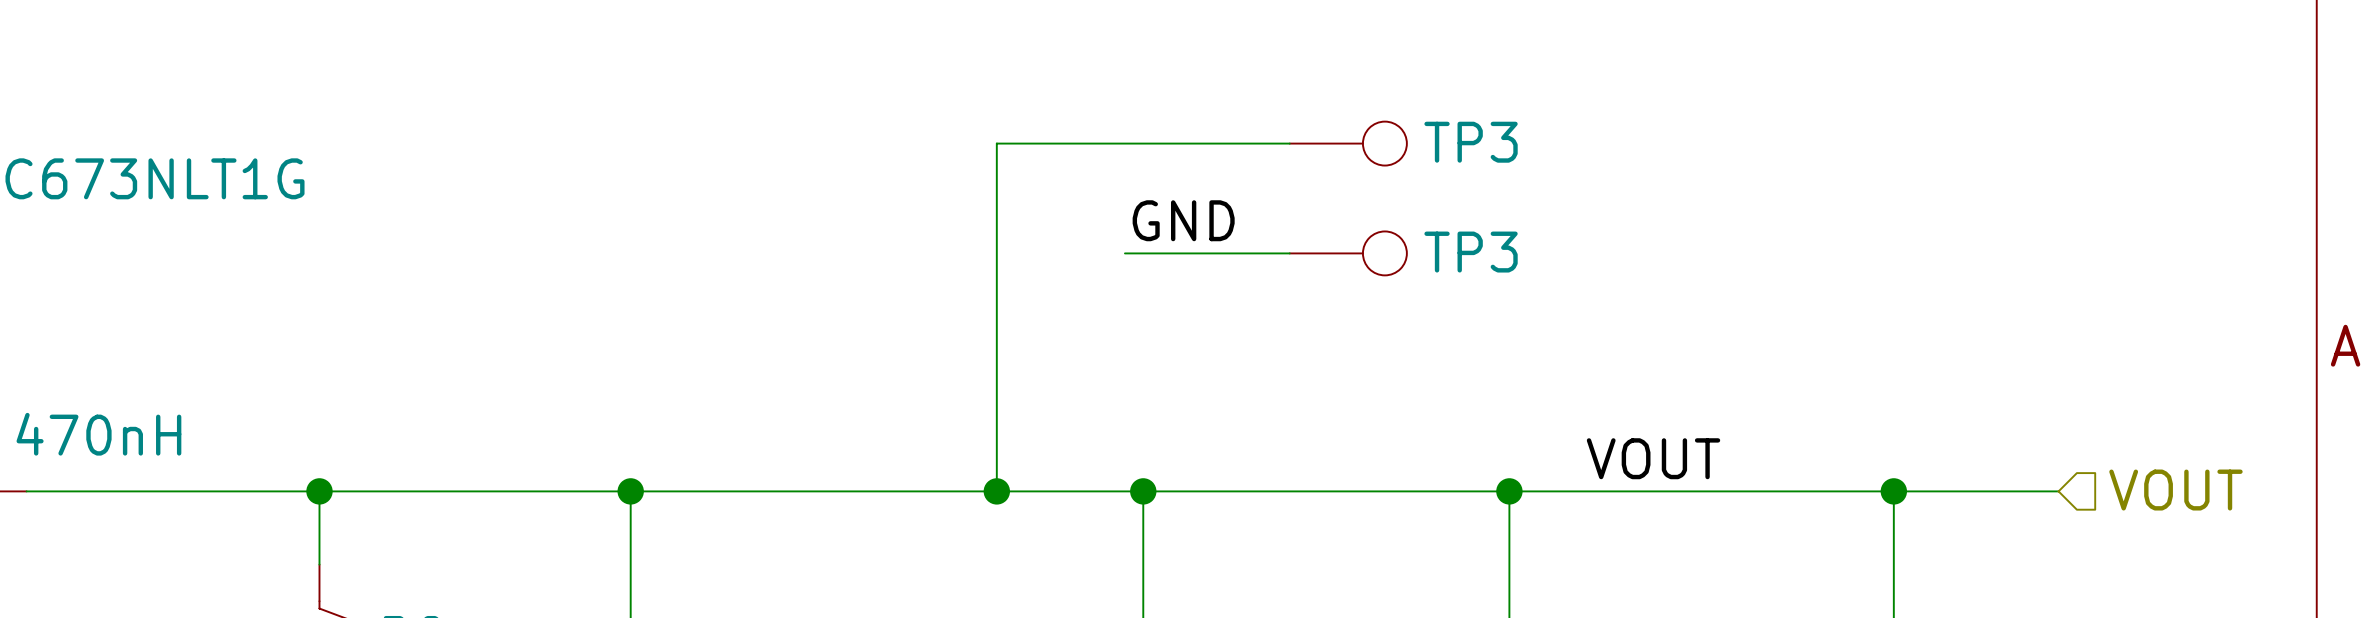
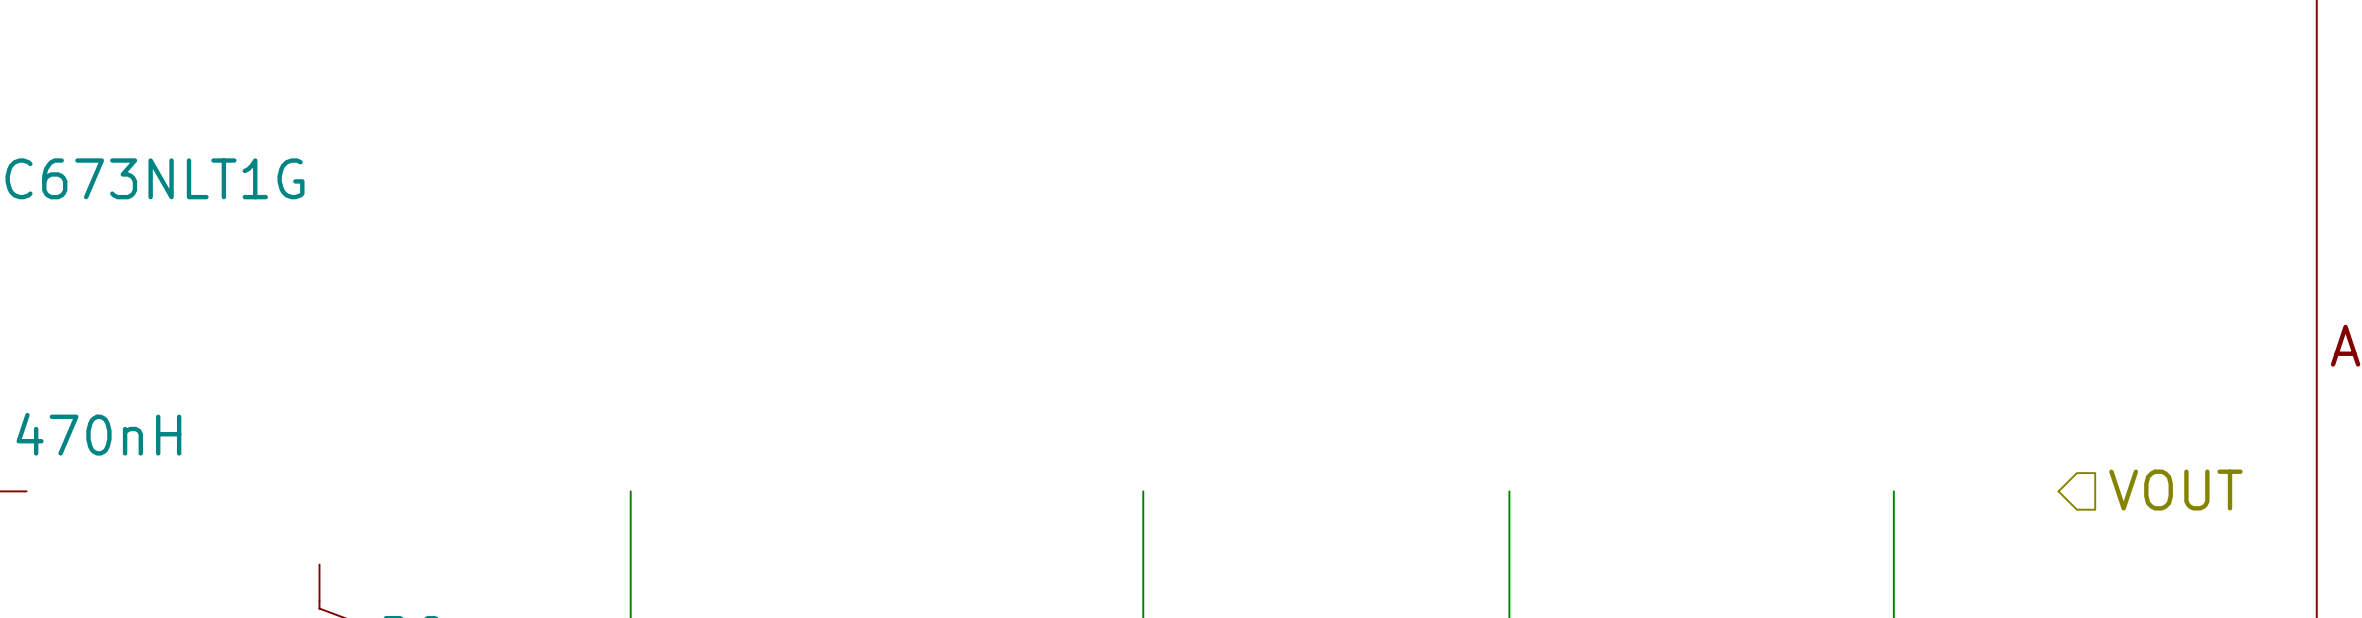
wire: (1289, 143) (996, 143) (996, 491) -> none
TP3: (1348, 143) -> none
label: GND (1183, 220) -> none
wire: (1124, 253) (1289, 253) -> none
TP3: (1348, 253) -> none
label: VOUT (1653, 458) -> none
wire: (26, 491) (2058, 491) -> none
wire: (319, 491) (319, 564) -> none
junction: (319, 491) -> none
junction: (630, 491) -> none
junction: (996, 491) -> none
junction: (1143, 491) -> none
junction: (1509, 491) -> none
junction: (1893, 491) -> none

